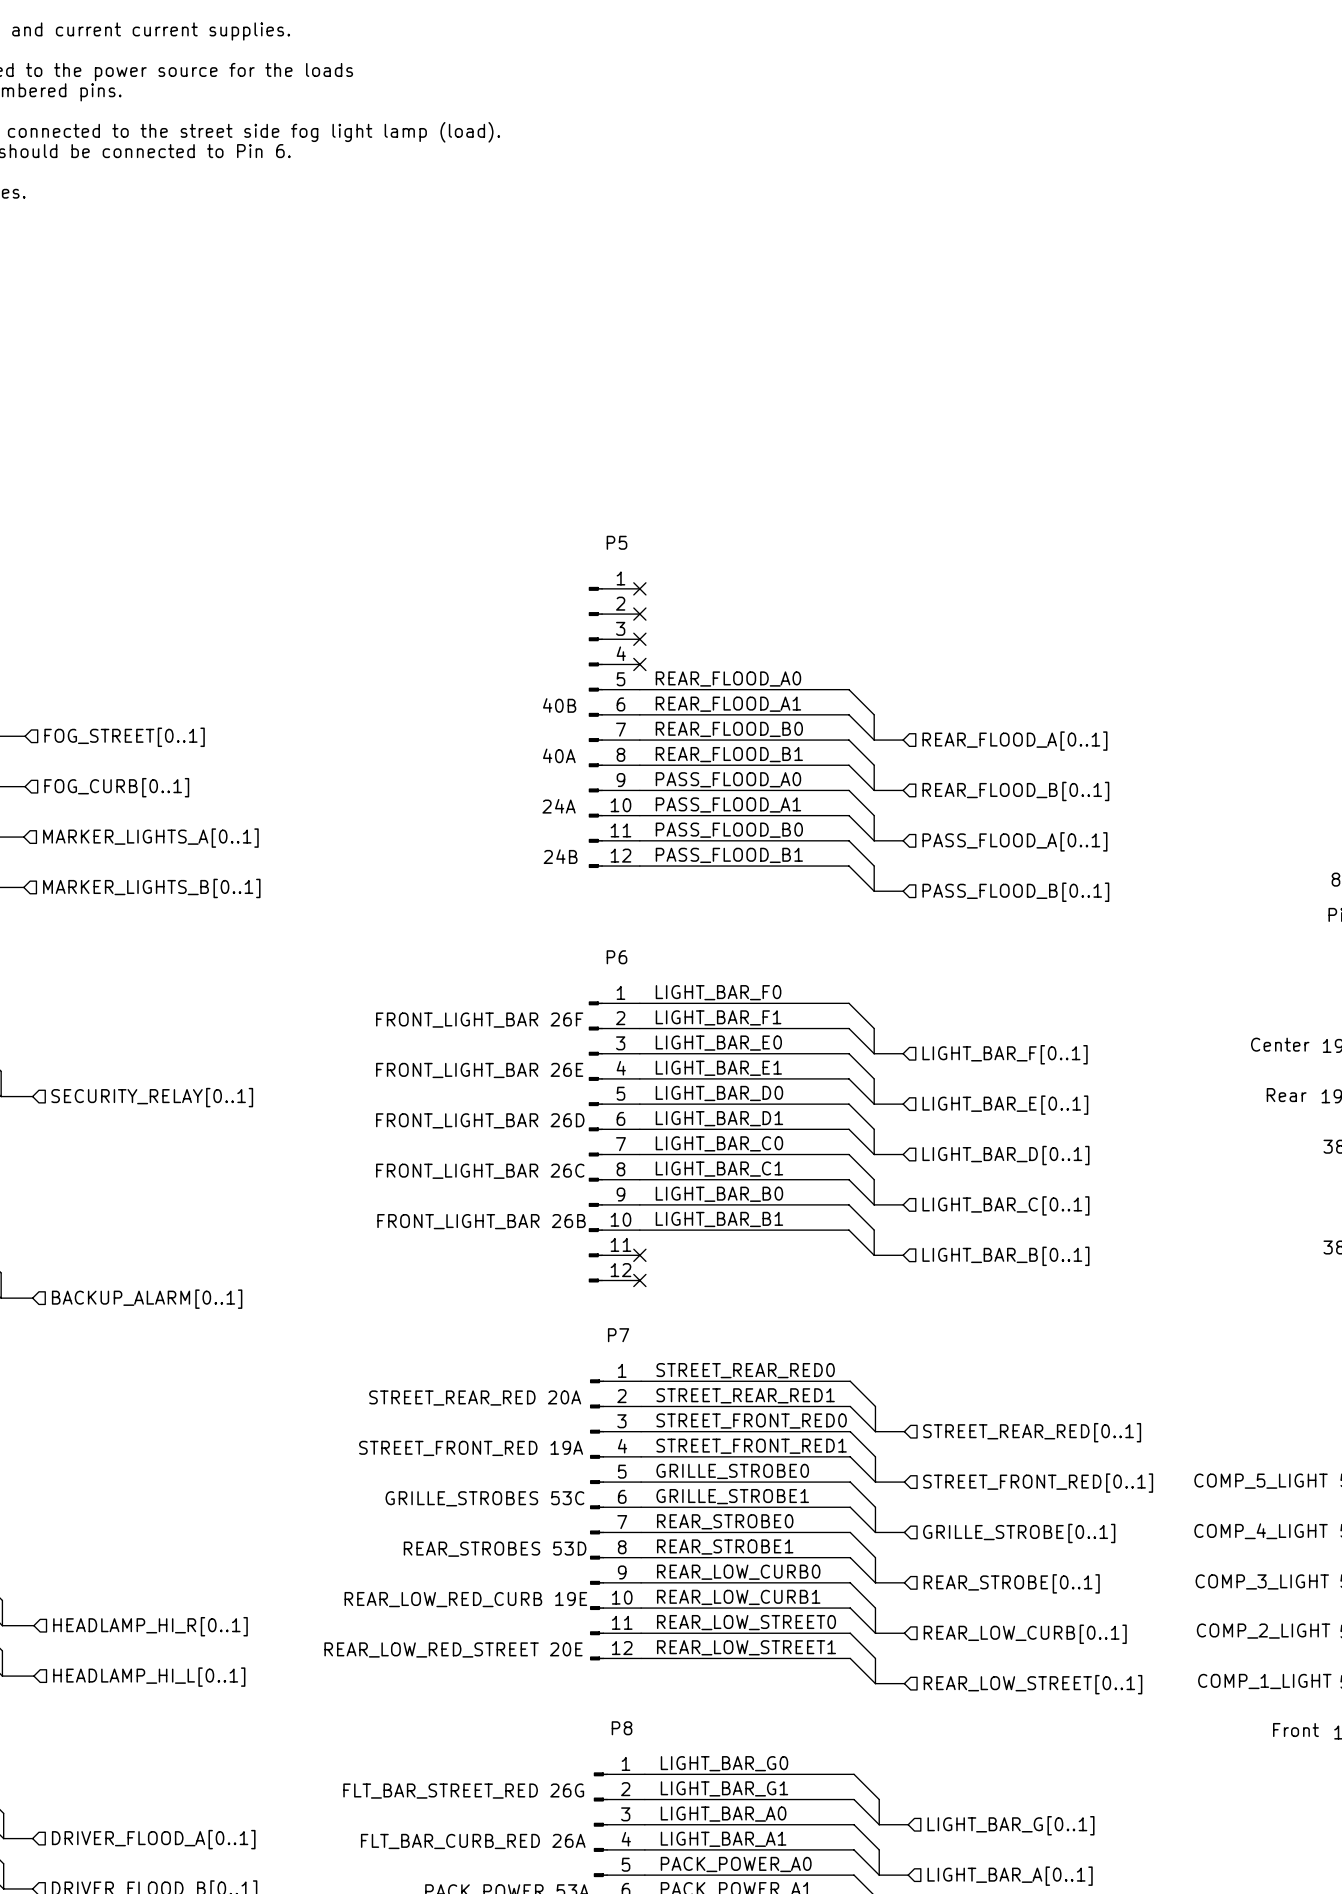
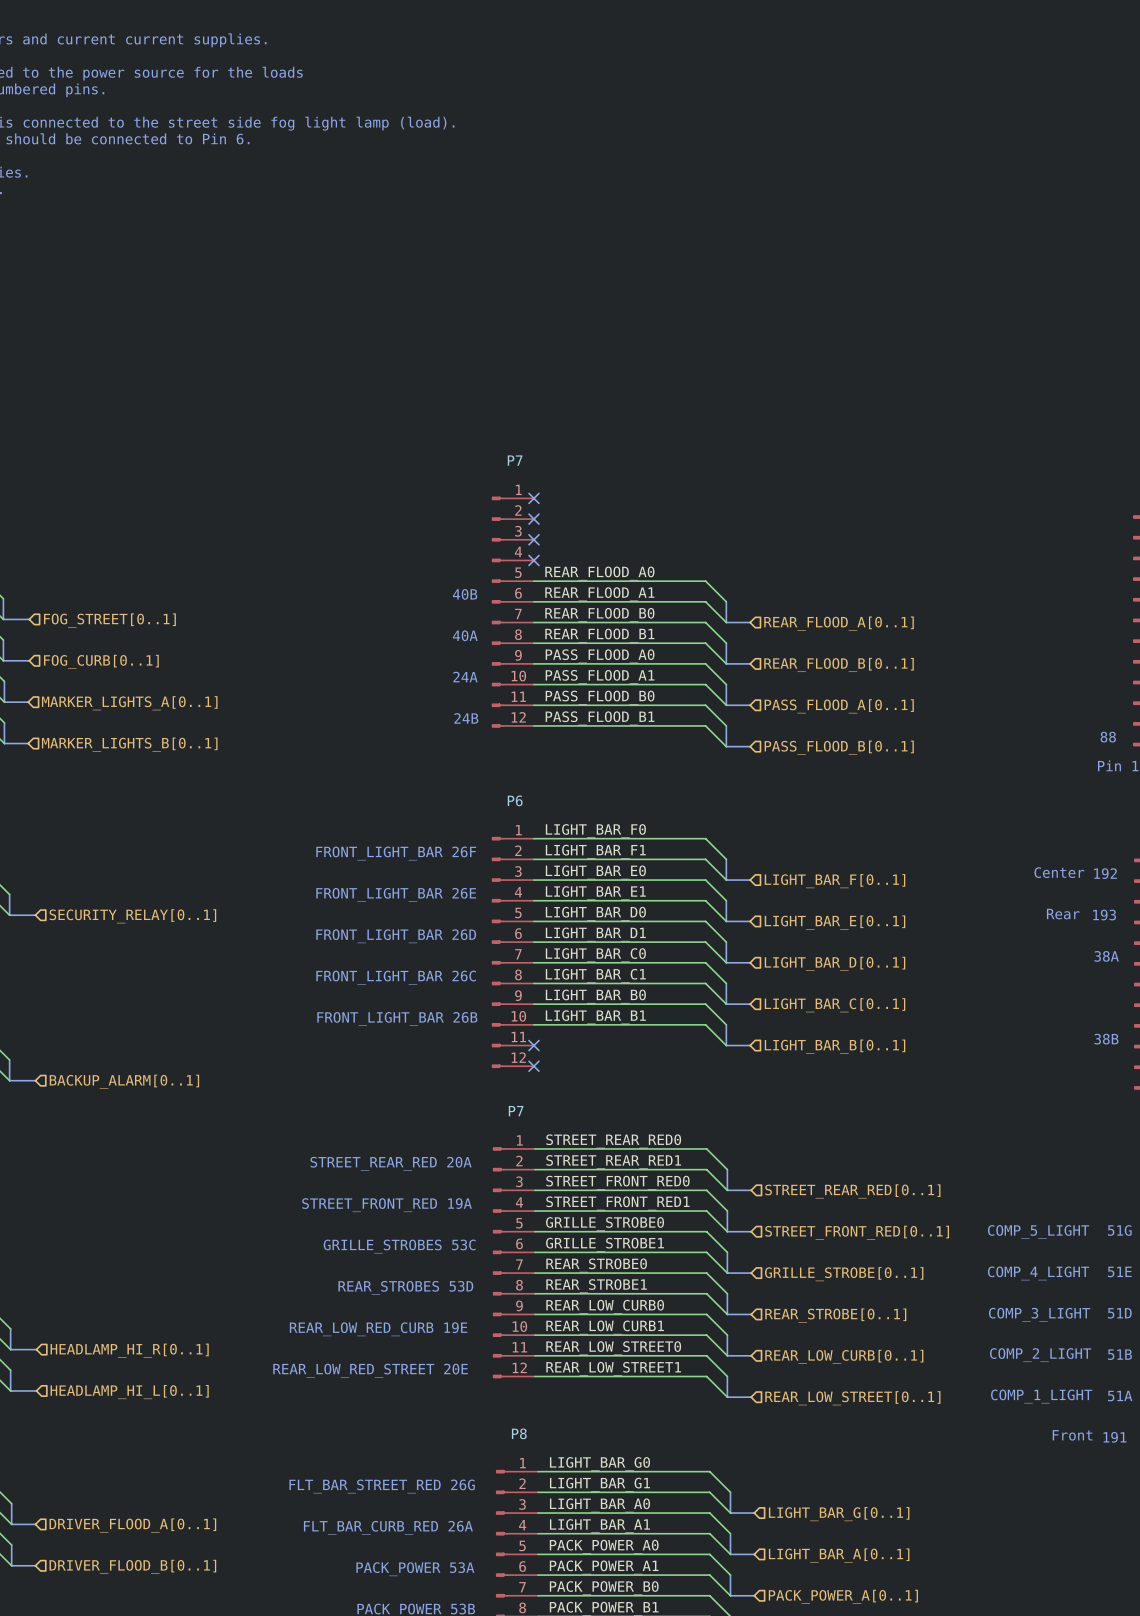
P5 name: P5 (616, 542) -> P7 (515, 460)

